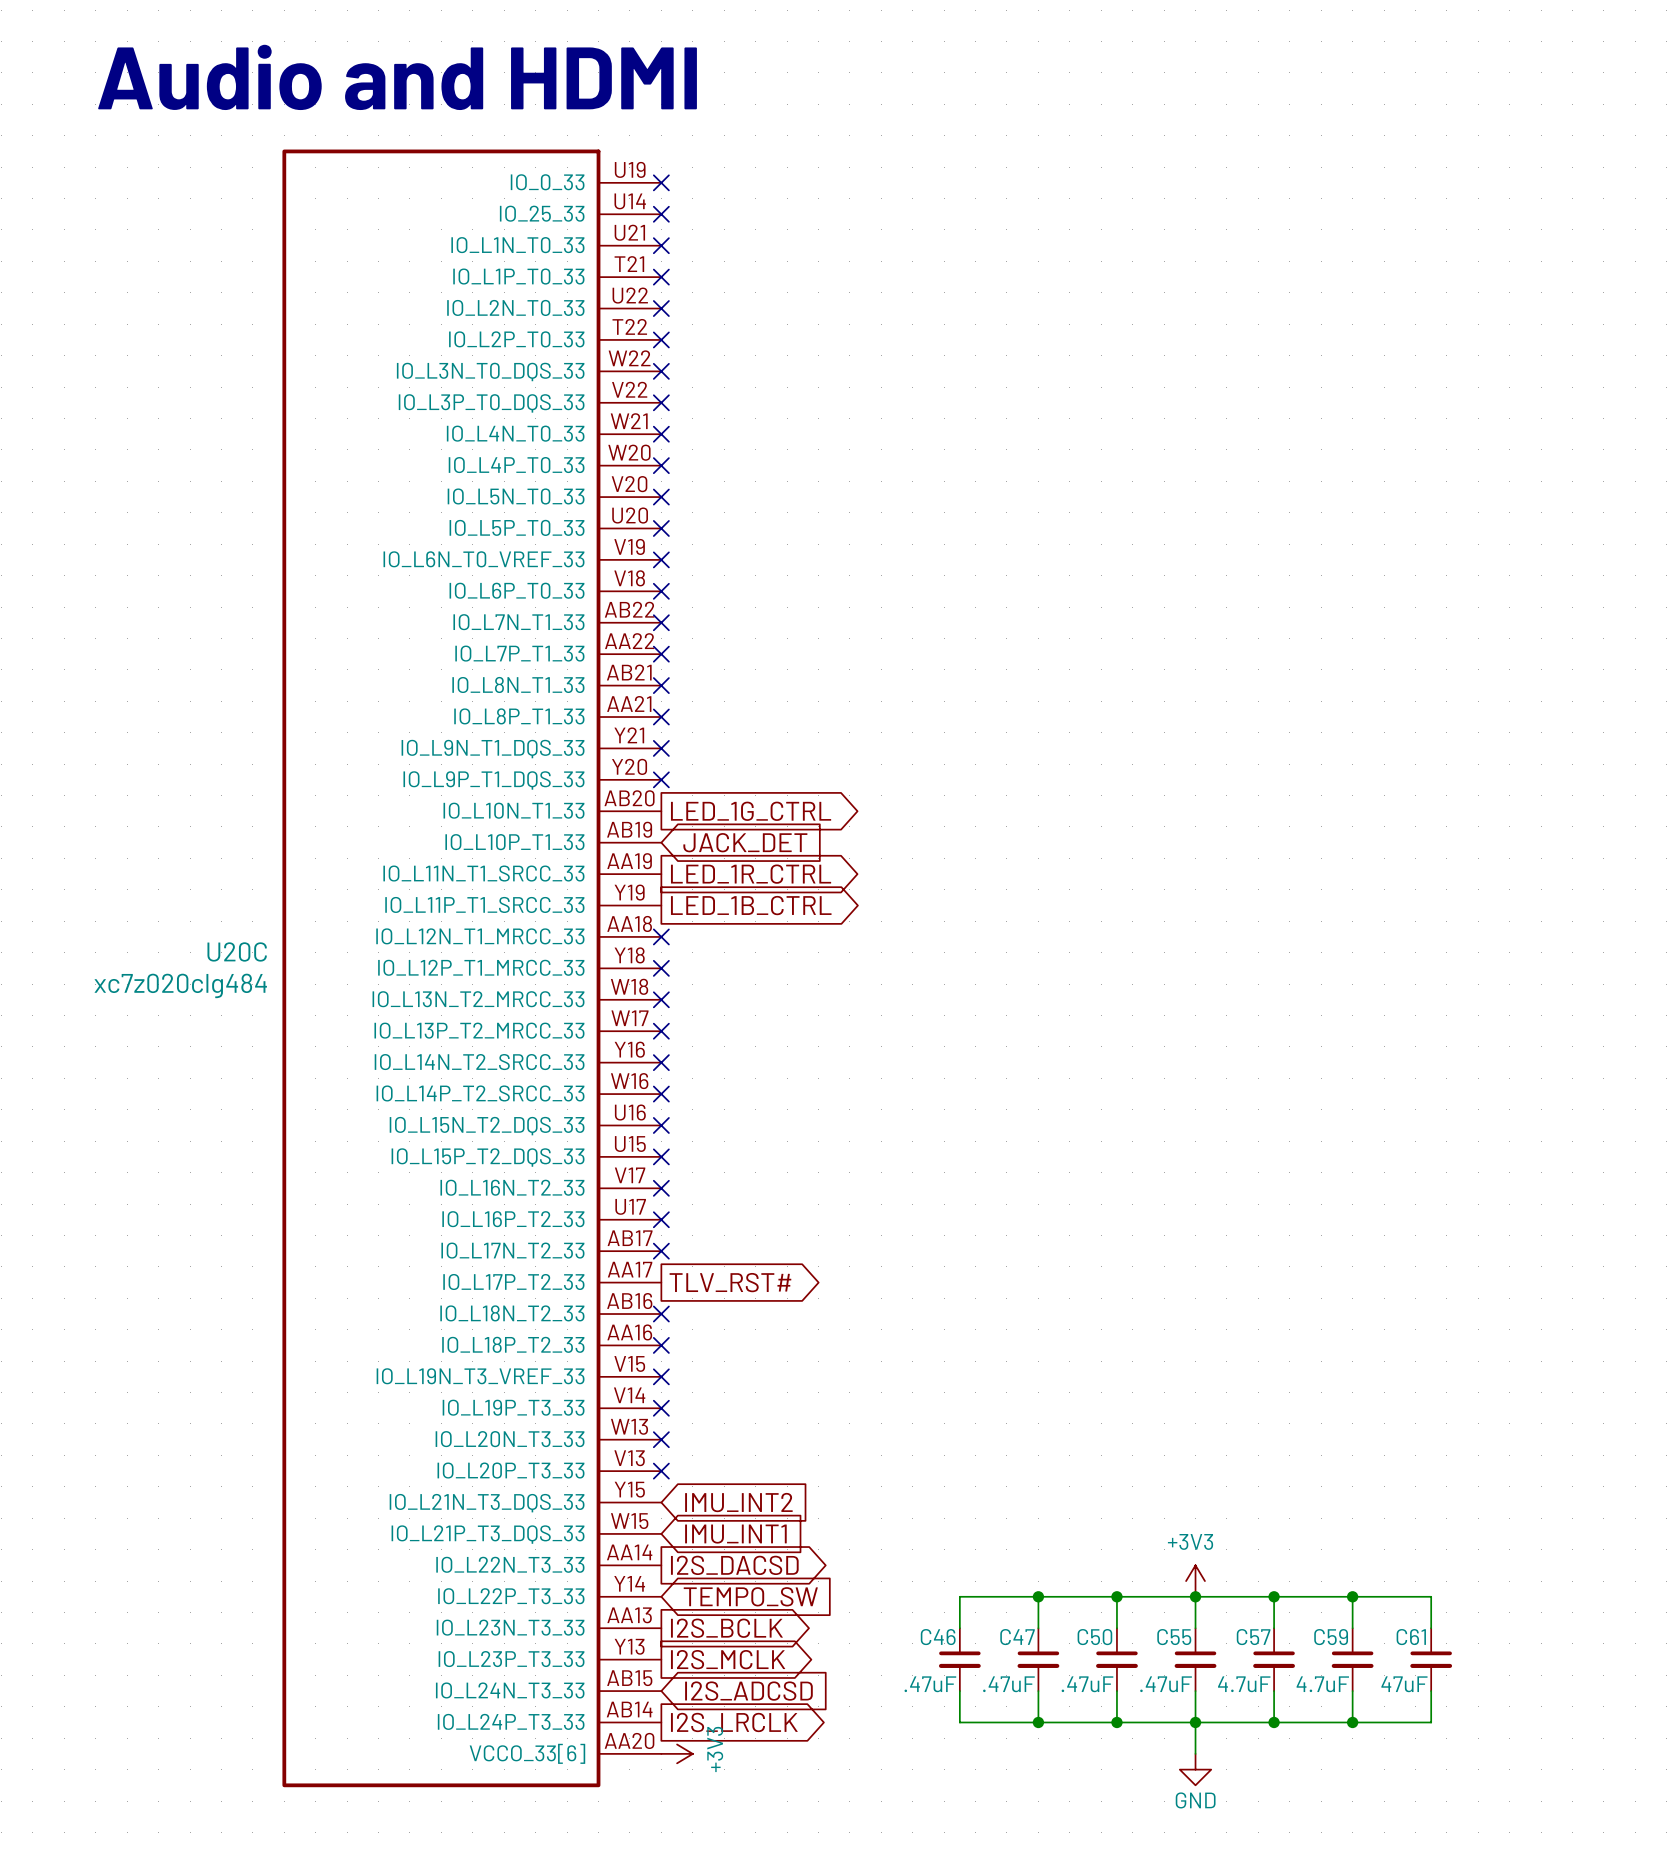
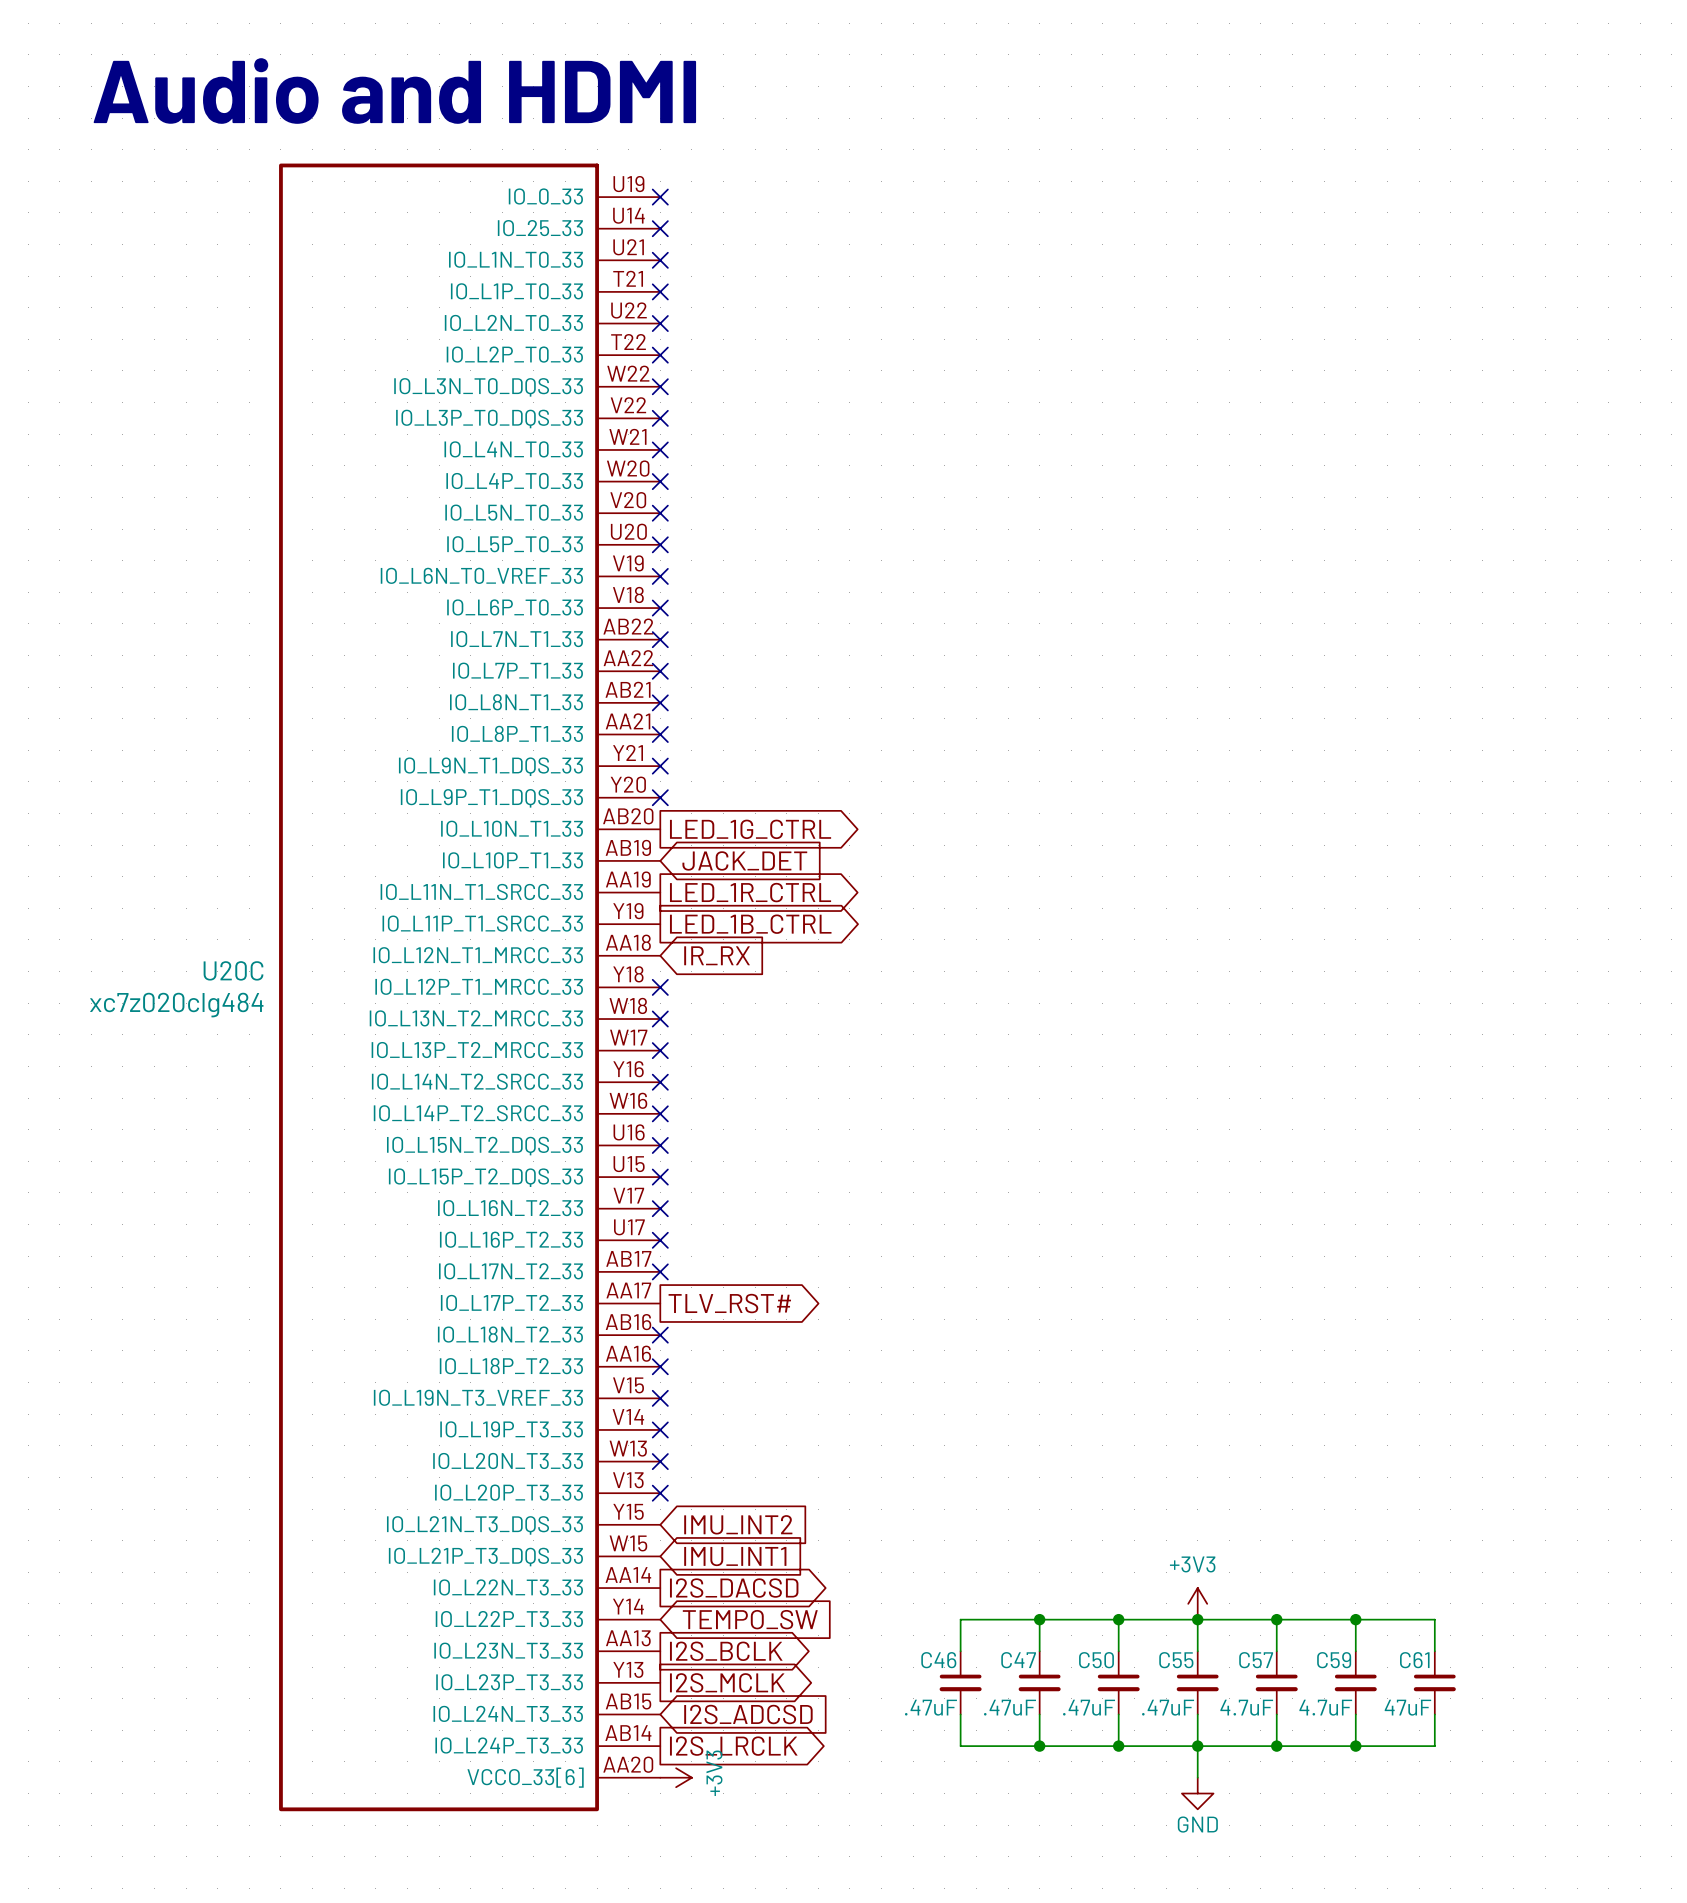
no-connect mark: (661, 936) -> none
global label: none -> IR_RX (717, 955)

